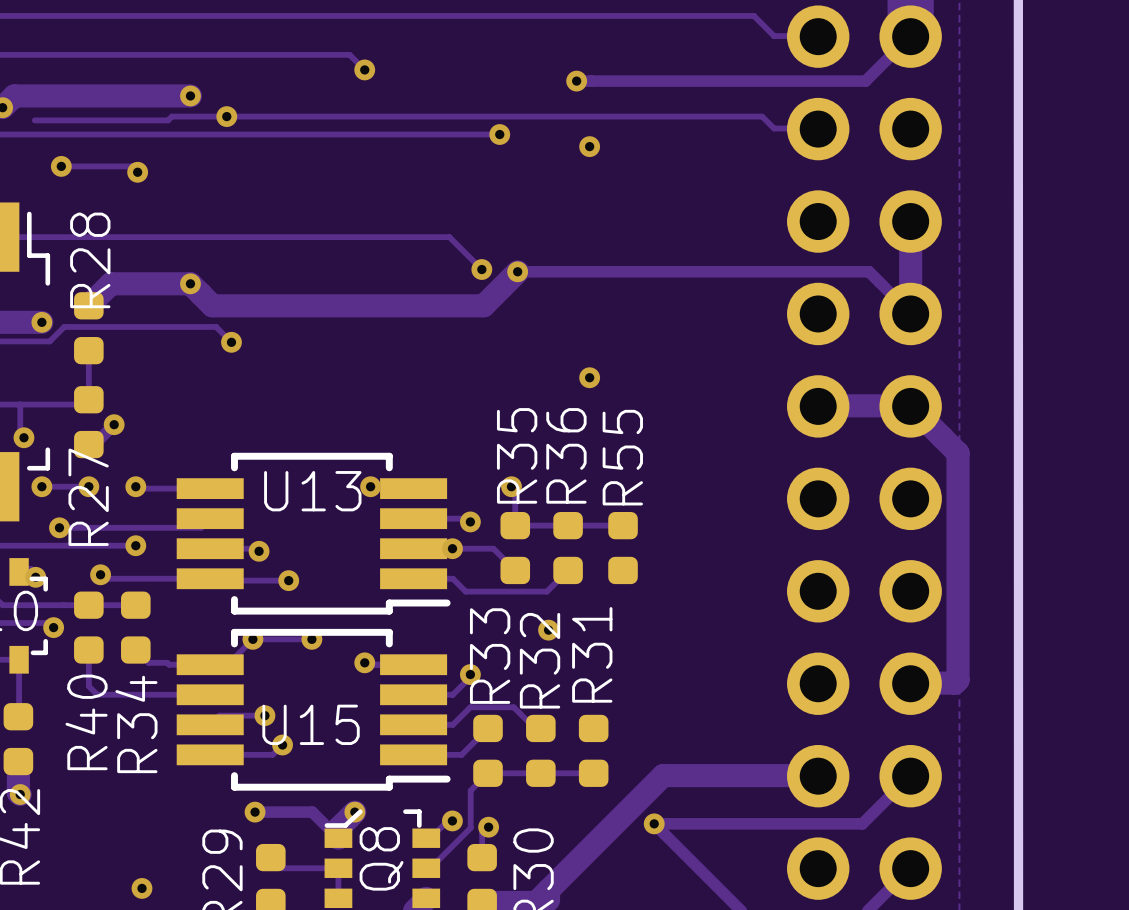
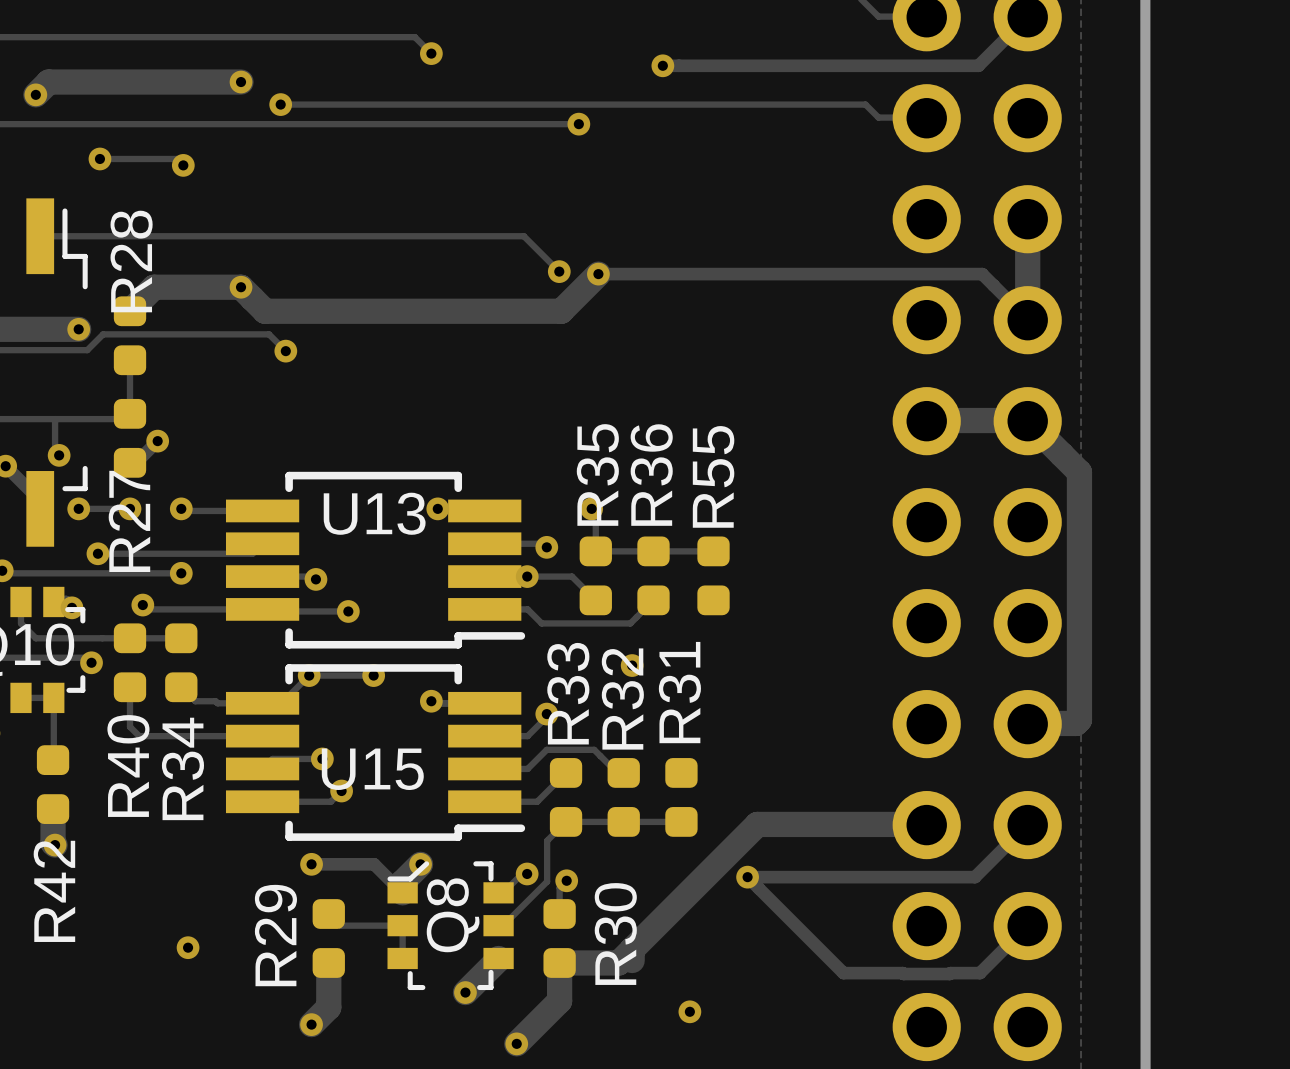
track: (226, 116) (171, 116) (168, 120) (34, 120) -> none
via: (589, 146) -> none
via: (589, 377) -> none

